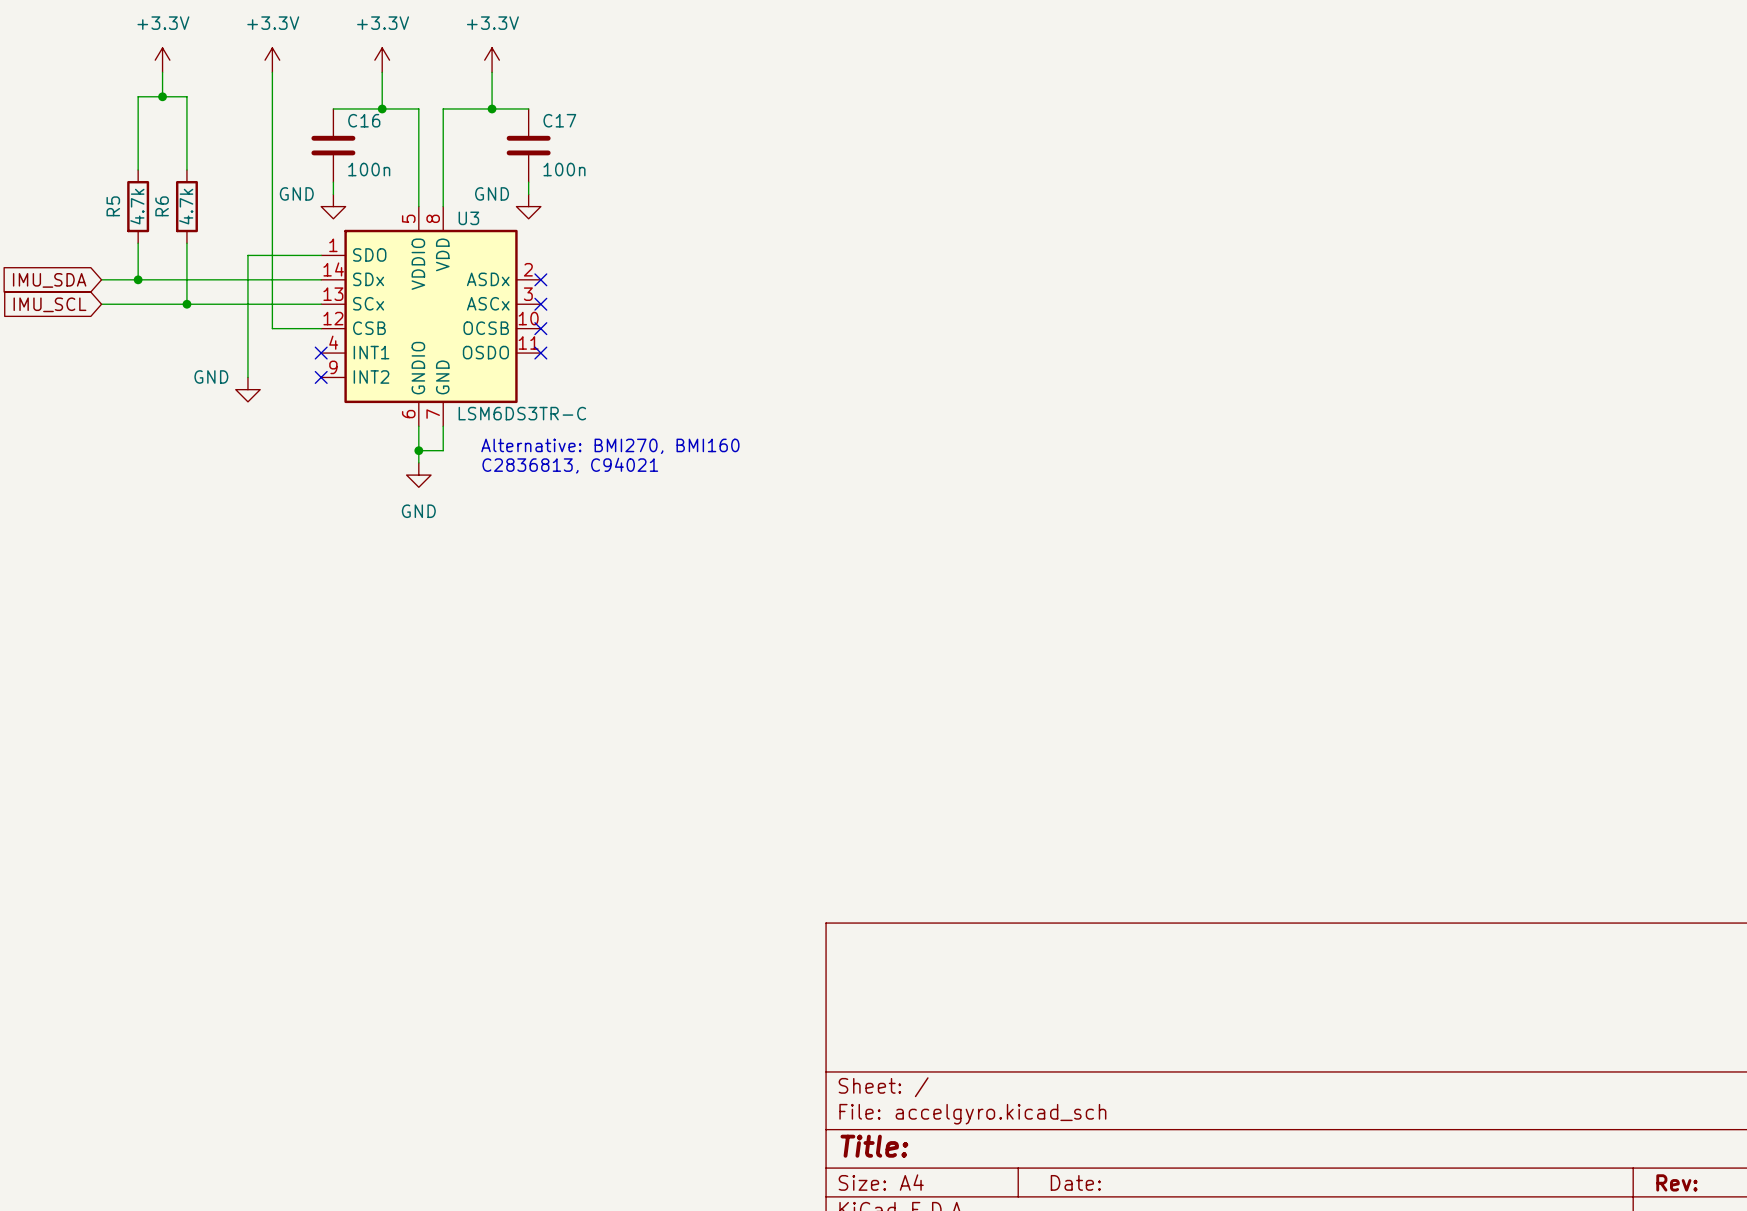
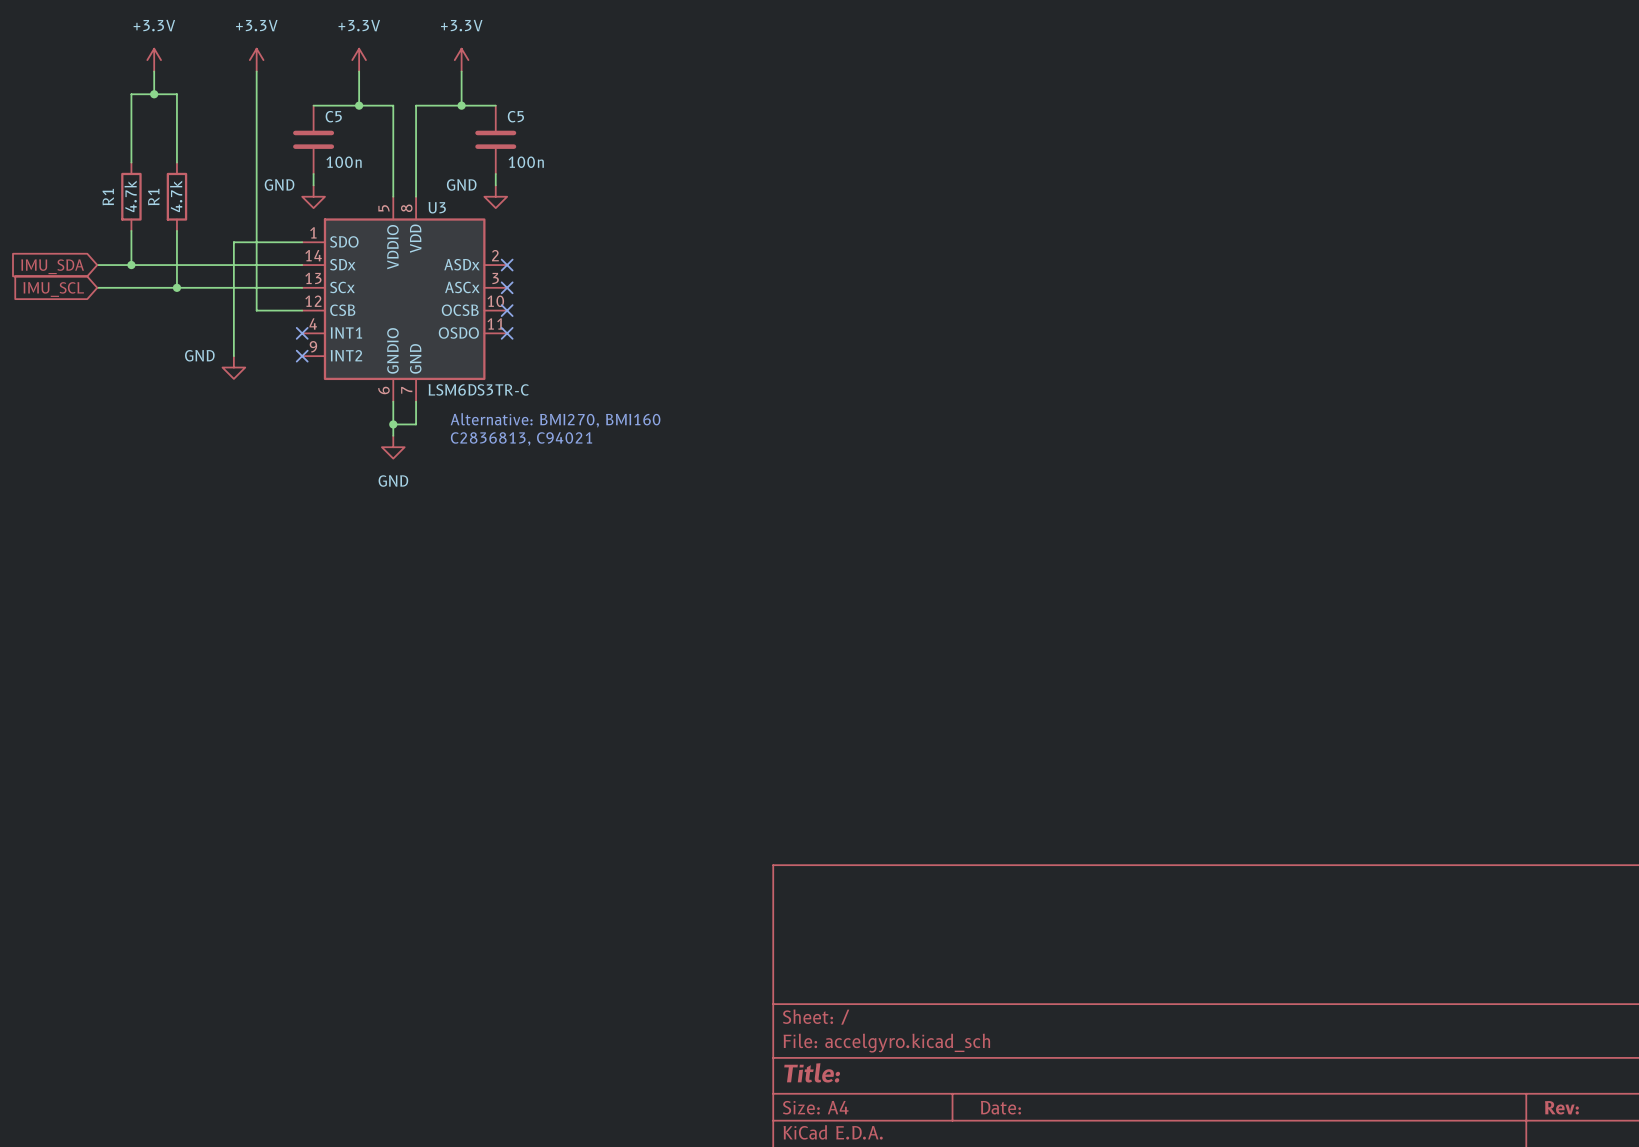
C16 name: C16 (364, 120) -> C5 (333, 116)
C17 name: C17 (559, 120) -> C5 (515, 116)
R5 name: R5 (113, 206) -> R1 (108, 197)
R6 name: R6 (162, 206) -> R1 (153, 197)

